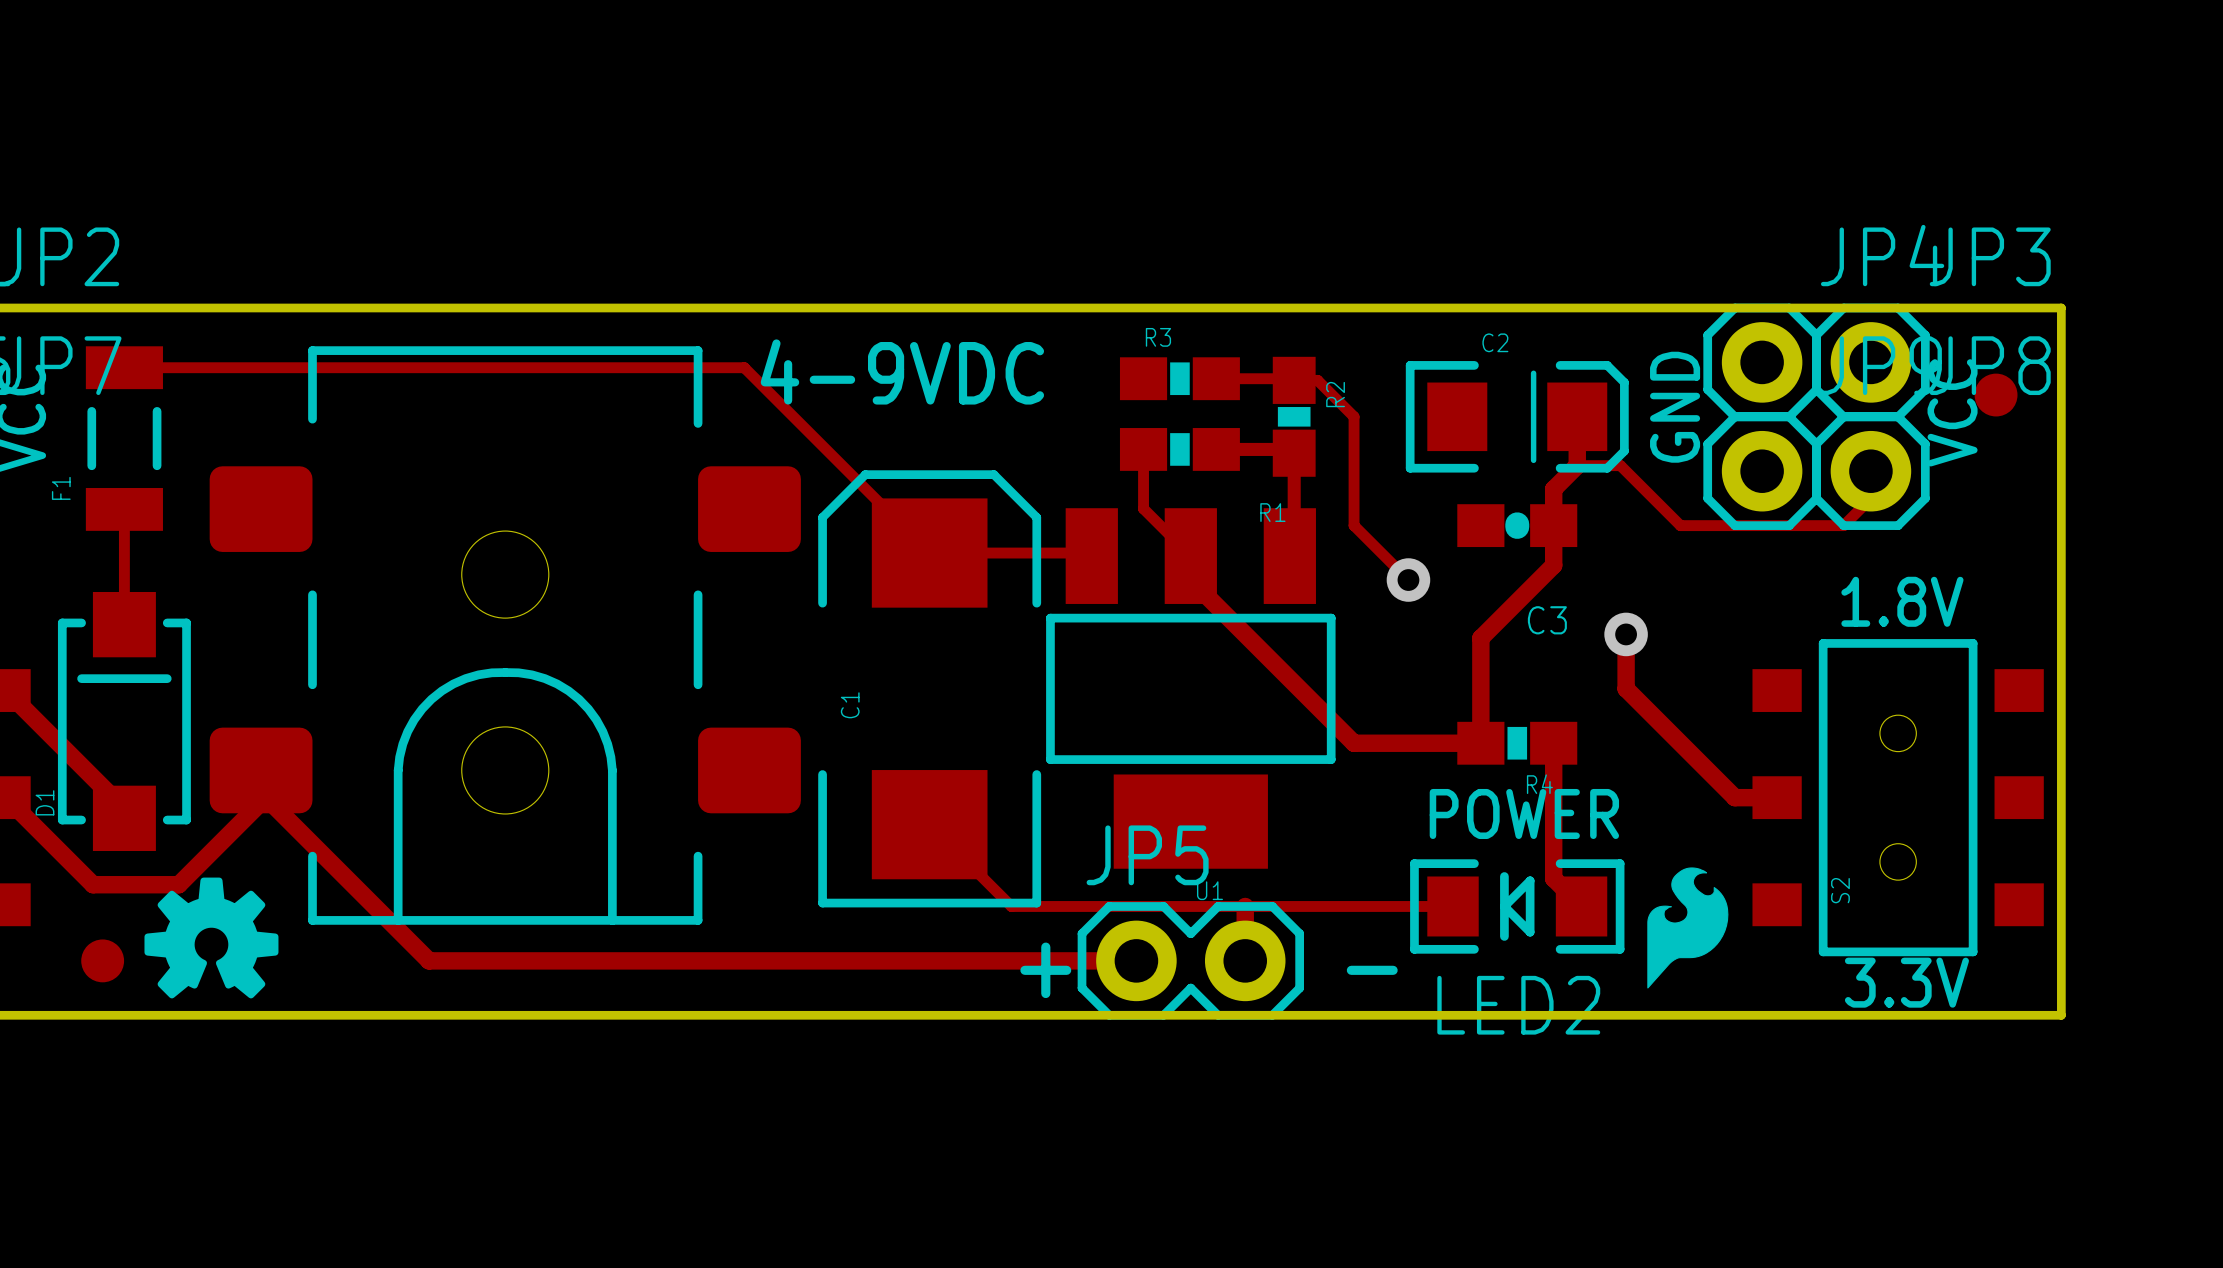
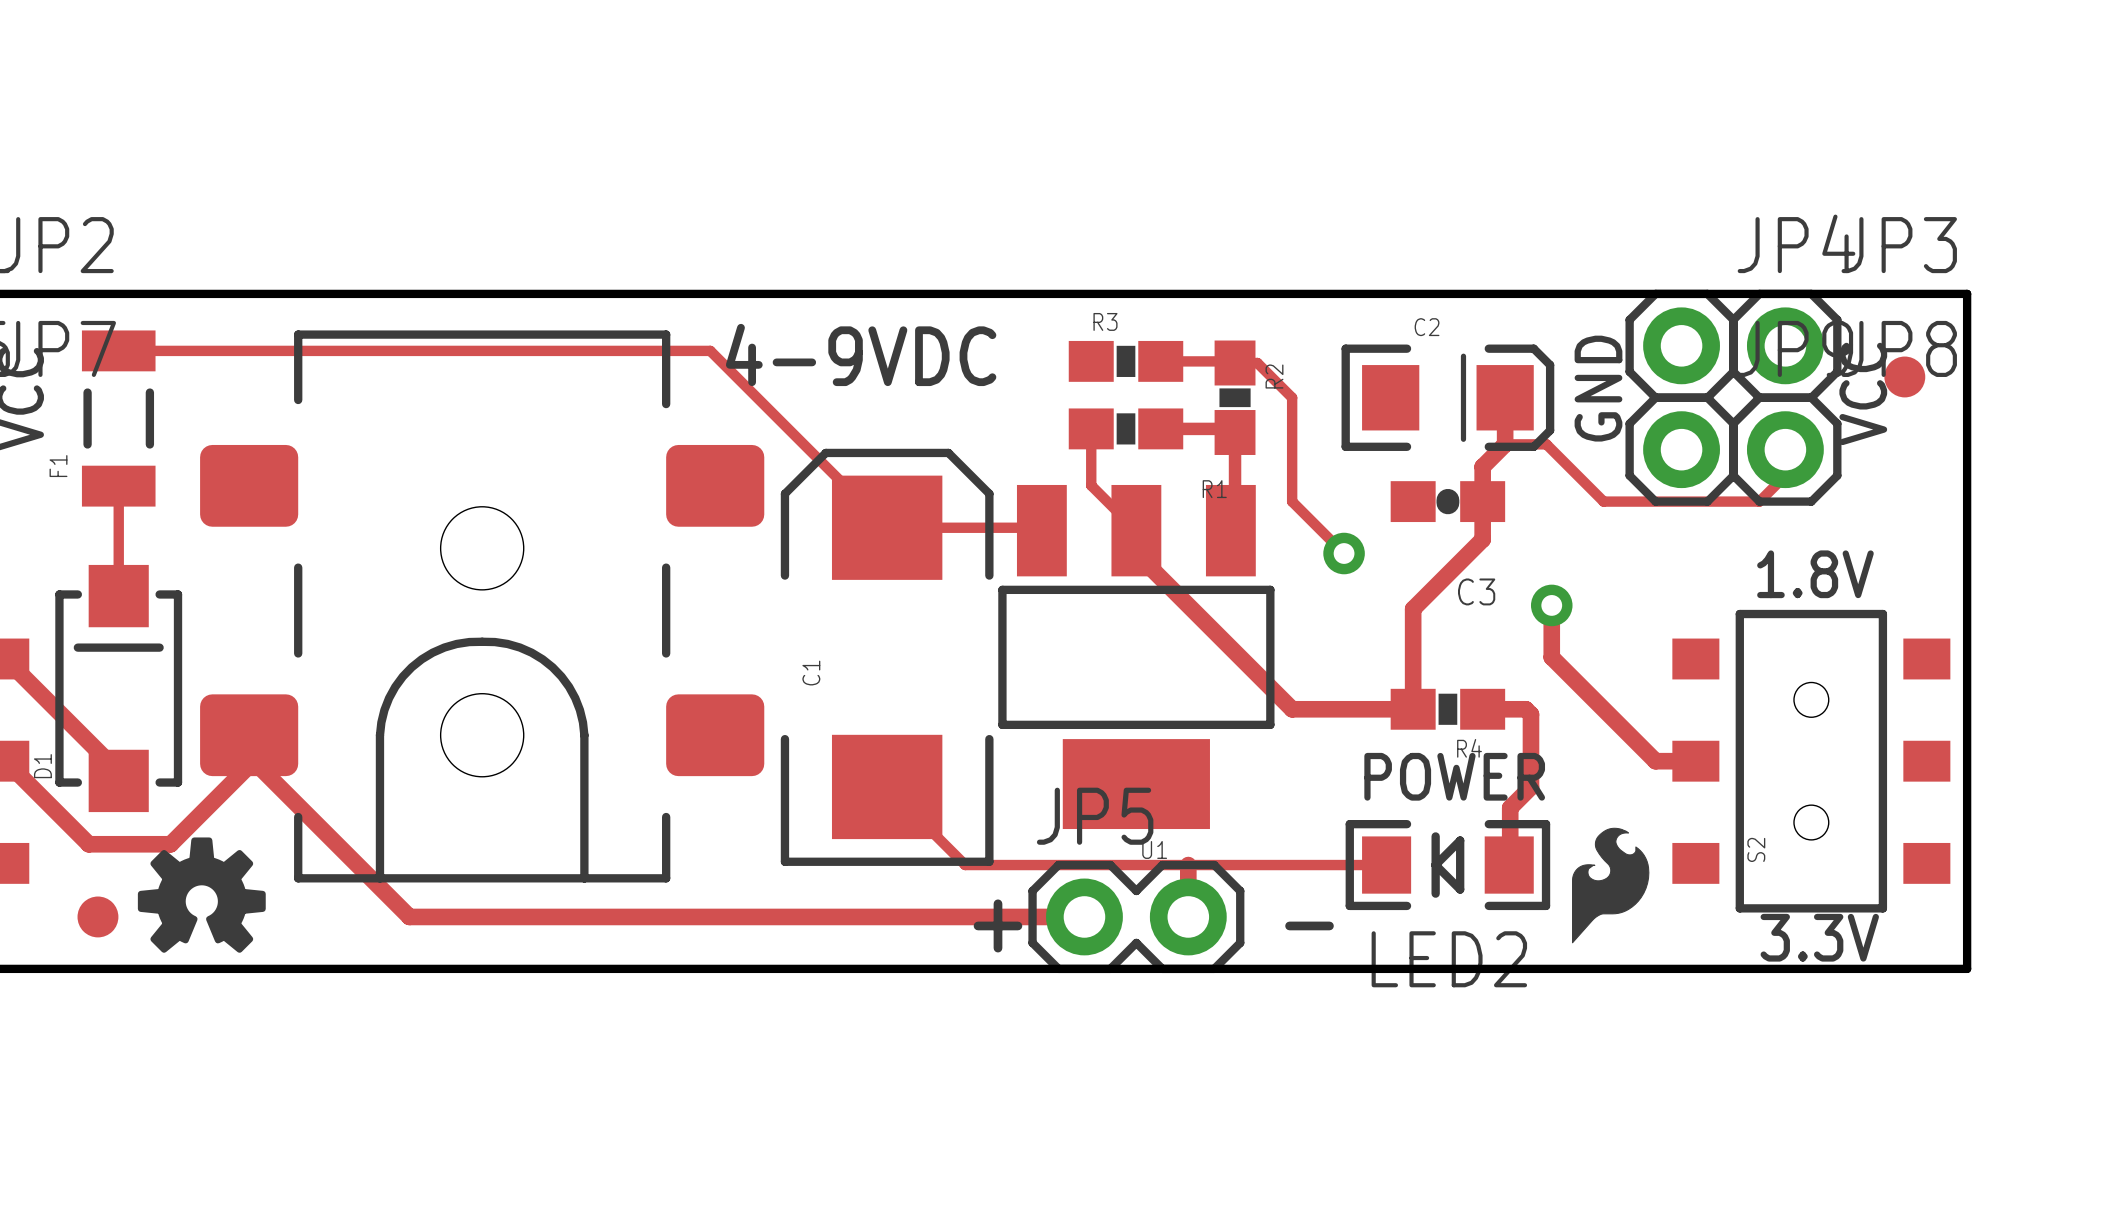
track: (1553, 743) (1553, 878) (1581, 906) -> (1499, 709) (1525, 709) (1530, 714) (1530, 787) (1510, 807) (1509, 865)

